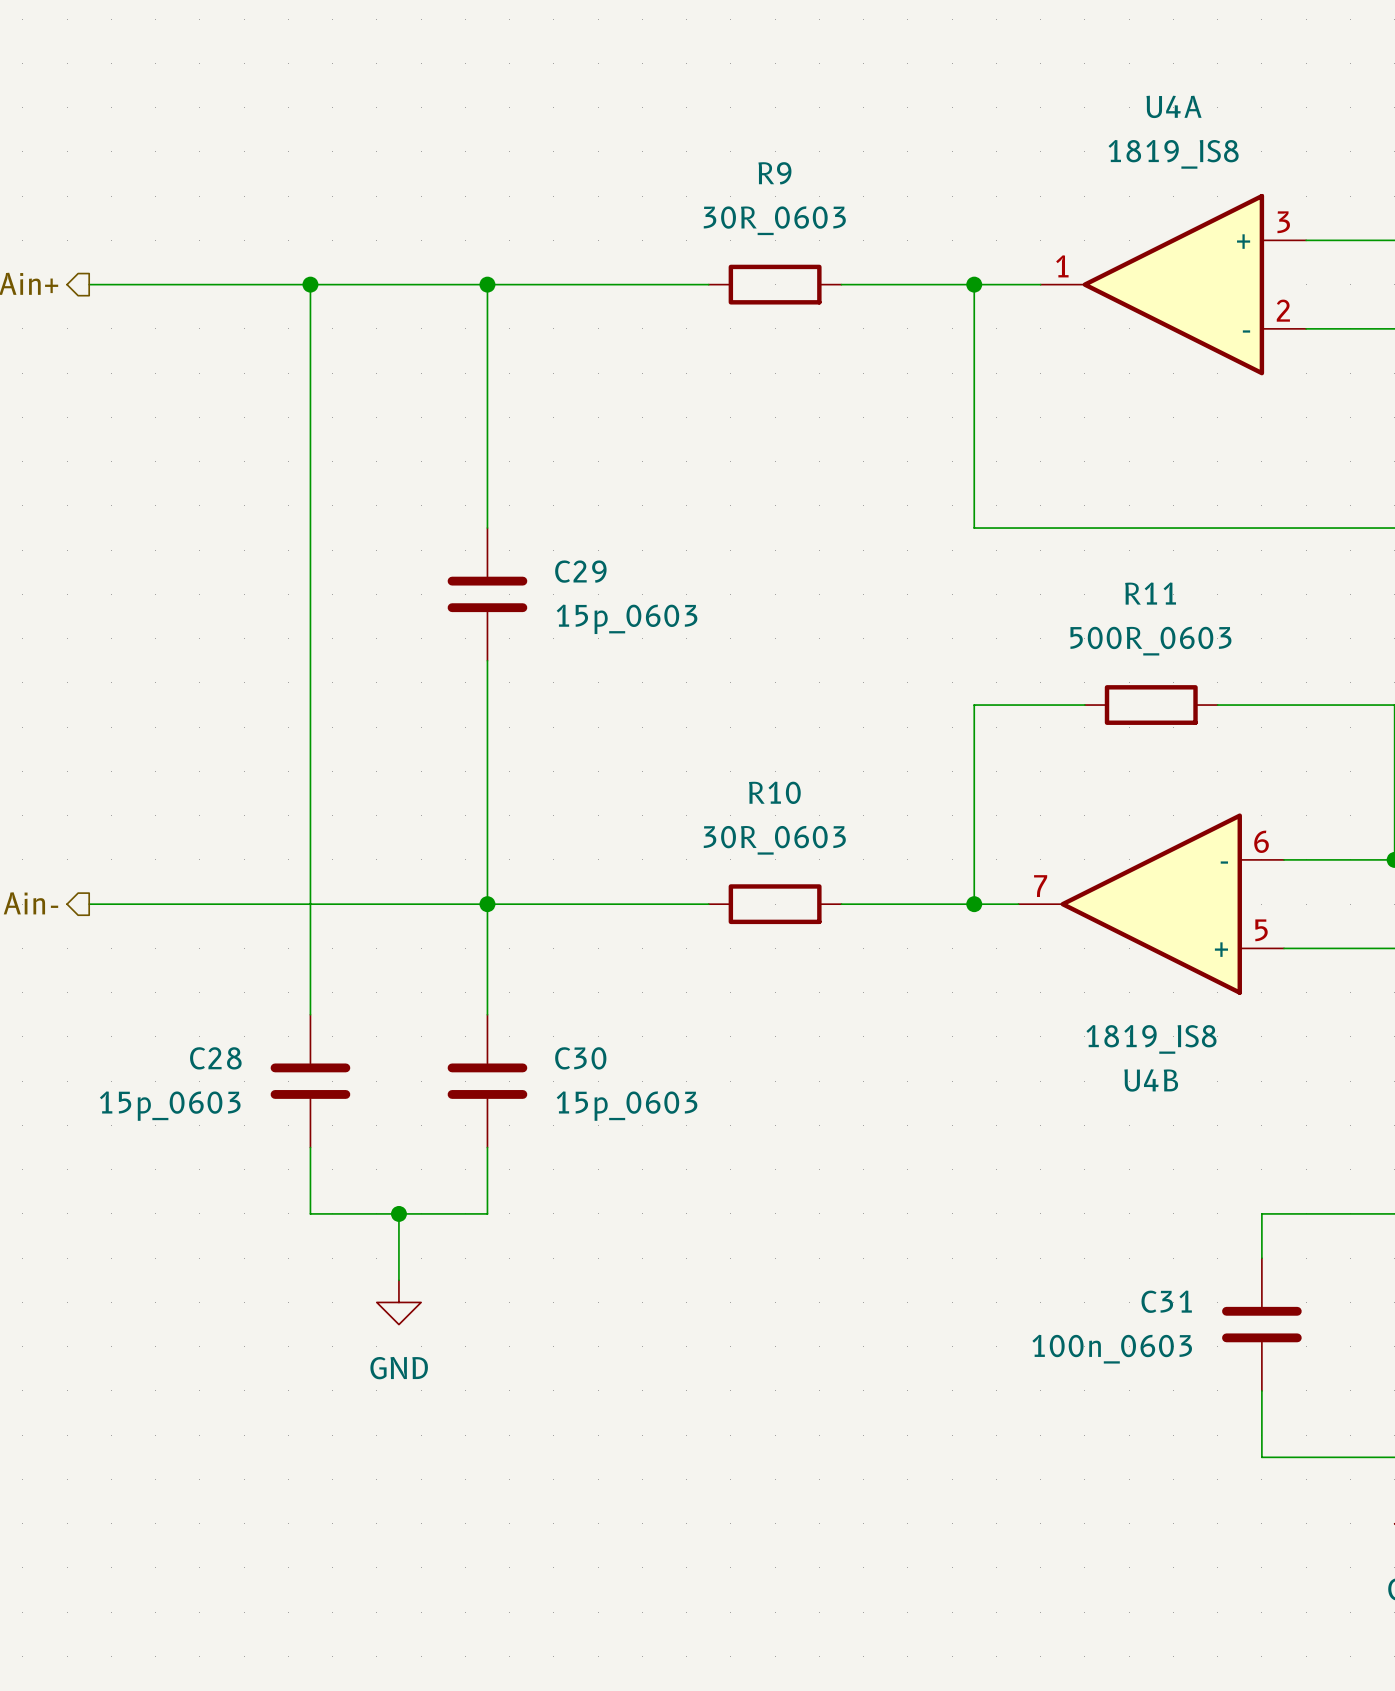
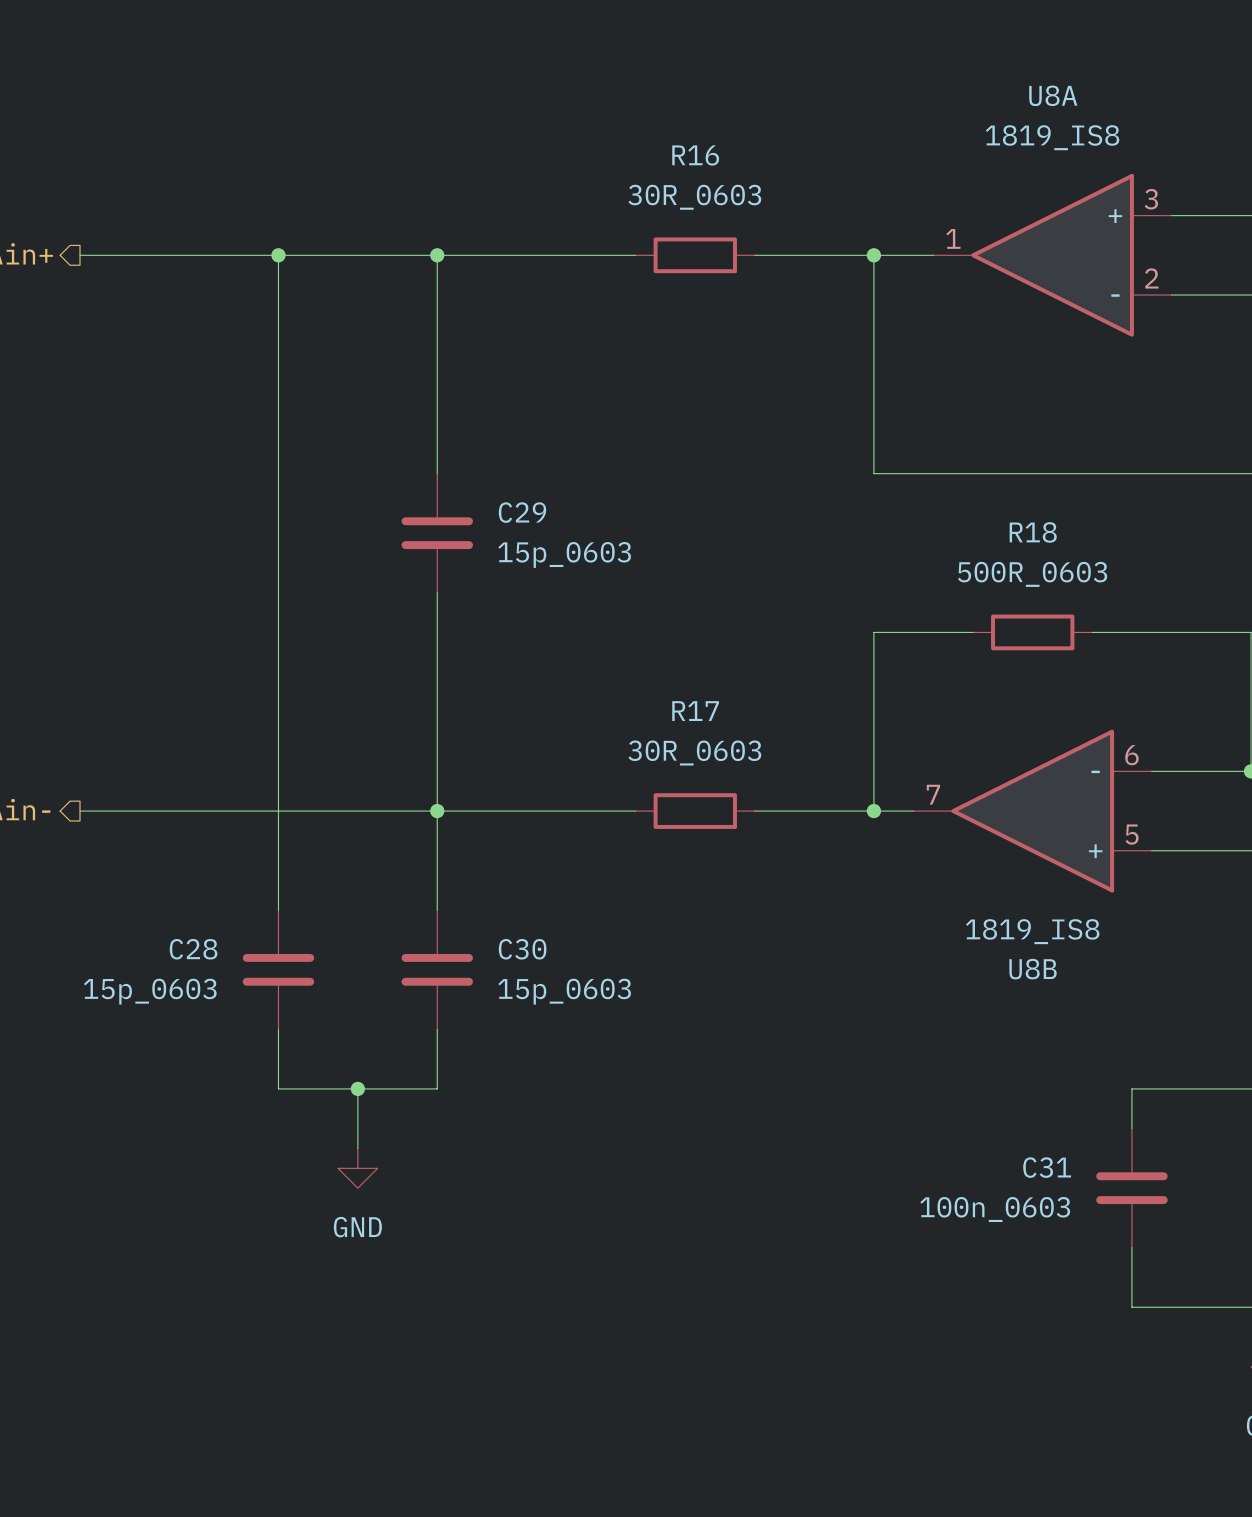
U4A name: U4A (1174, 106) -> U8A (1053, 95)
R9 name: R9 (774, 173) -> R16 (695, 155)
R11 name: R11 (1150, 593) -> R18 (1033, 532)
R10 name: R10 (774, 792) -> R17 (695, 711)
U4B name: U4B (1151, 1080) -> U8B (1033, 969)

